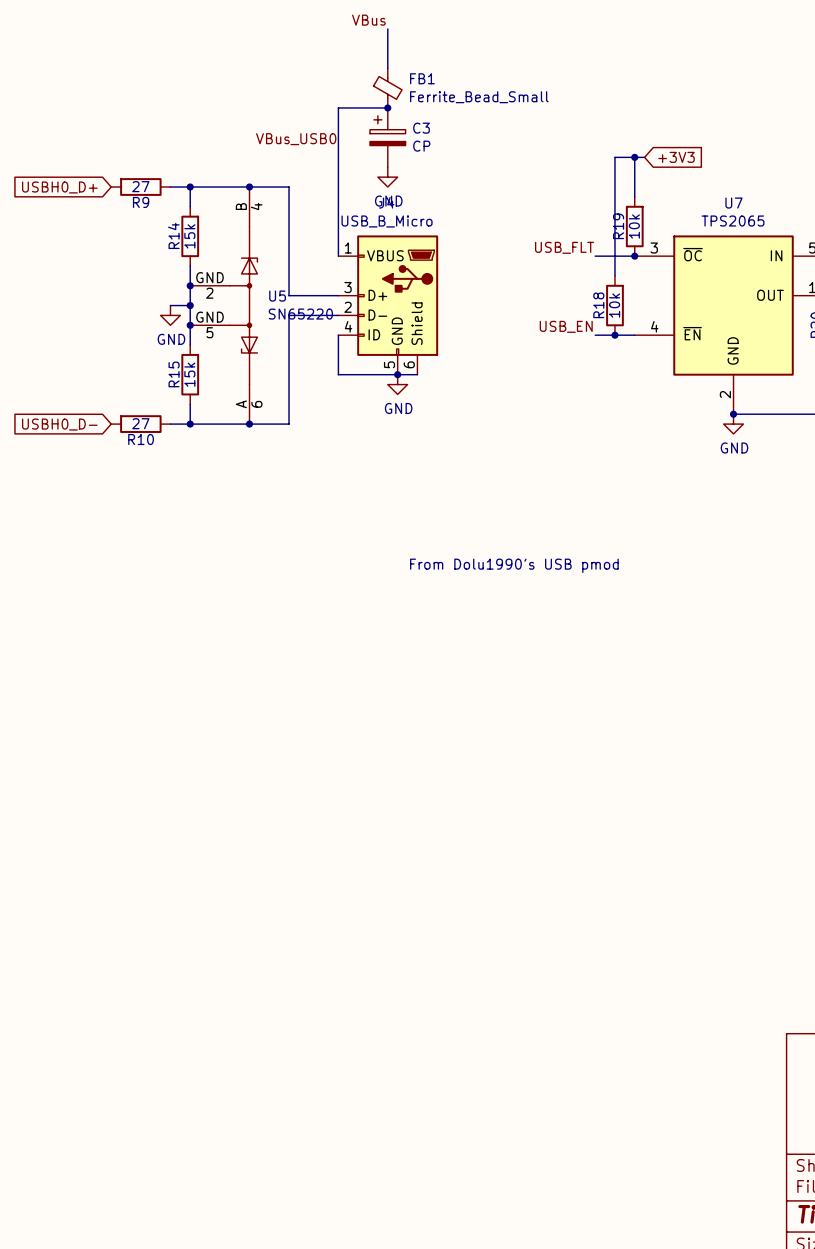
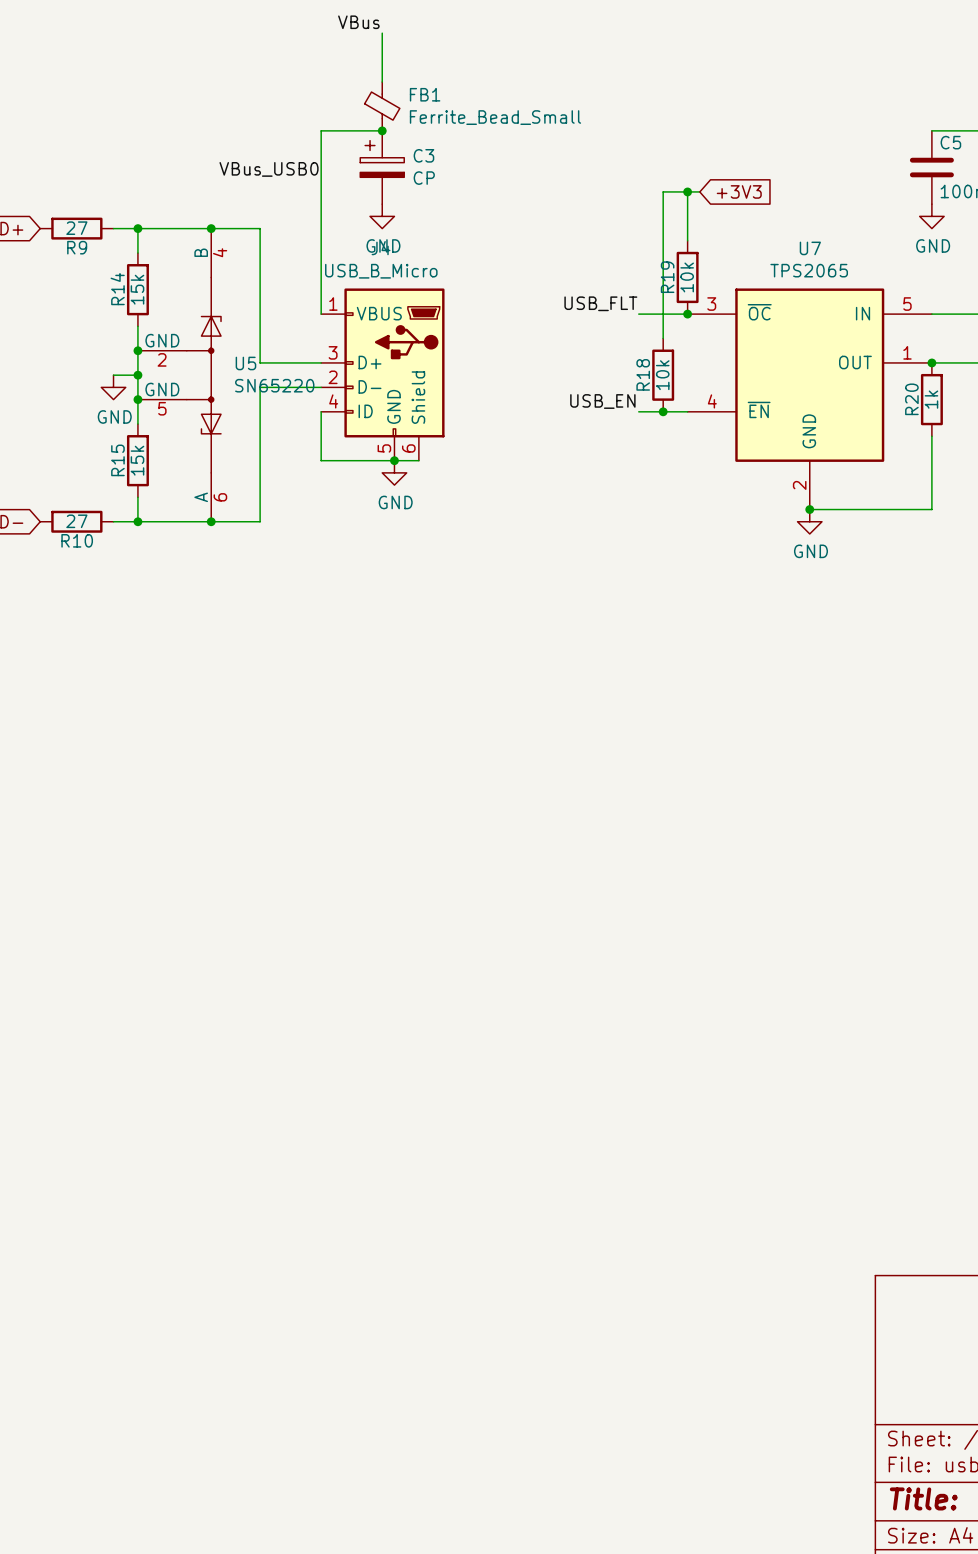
text: From Dolu1990's USB pmod (514, 565) -> none

